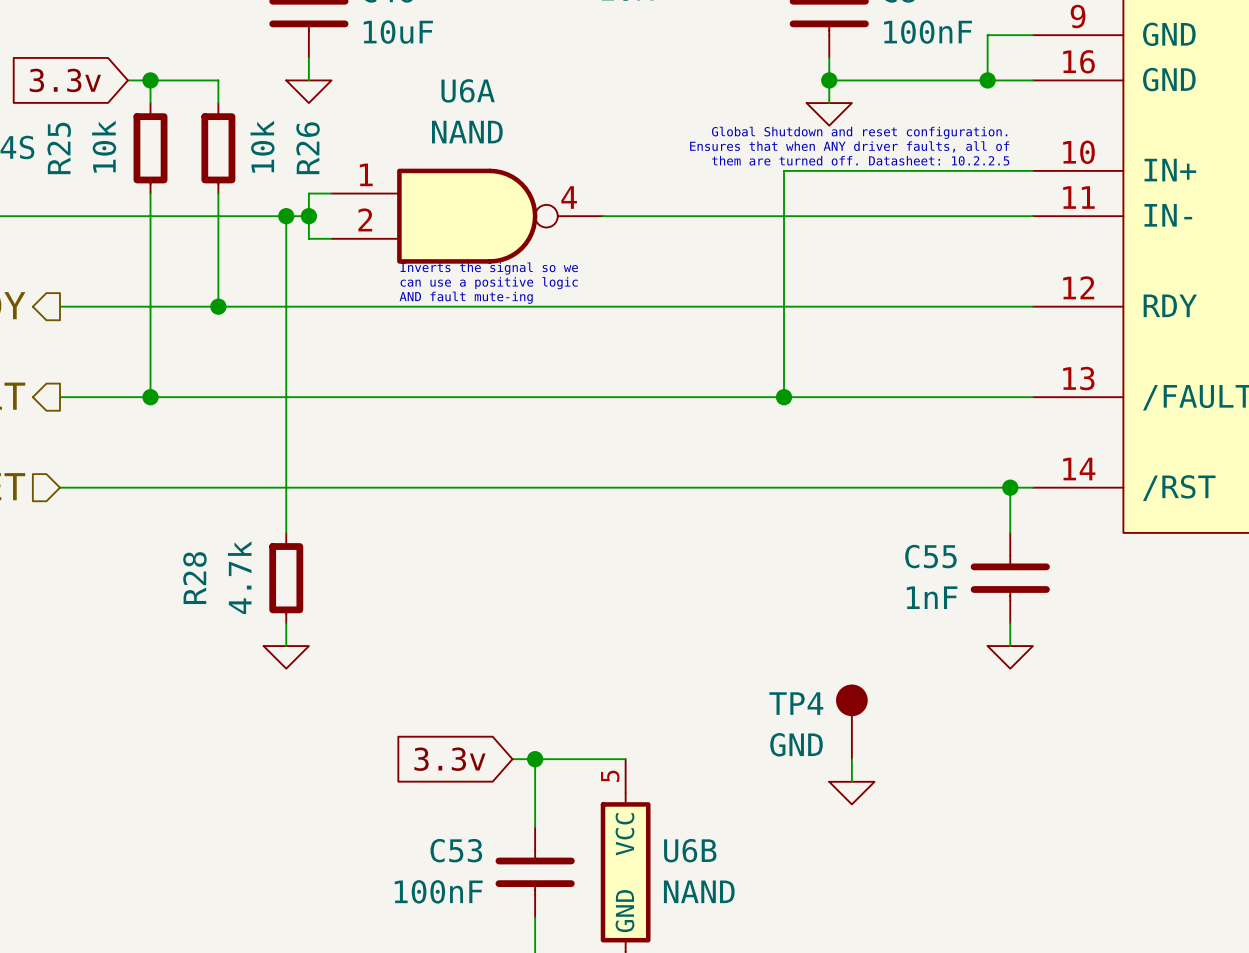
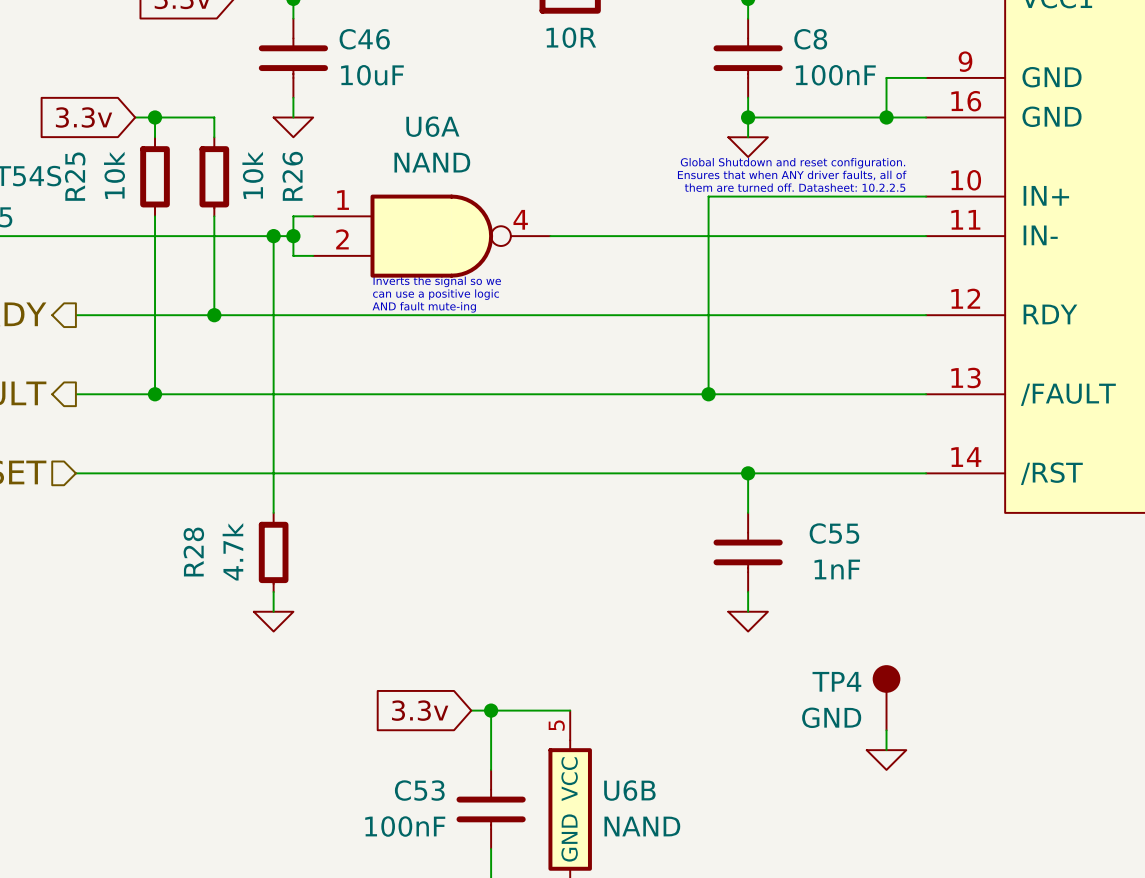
junction: none -> (748, 473)
wire: (1010, 487) (1010, 532) -> (748, 473) (748, 512)
junction: (1010, 487) -> none
C55 position: (1010, 578) -> (748, 552)
wire: (1010, 623) (1010, 646) -> (886, 730) (886, 750)
power symbol: none -> (748, 621)
power symbol: (1010, 657) -> none
TP4 position: (851, 721) -> (886, 697)
wire: (851, 759) (851, 781) -> (748, 591) (748, 611)
power symbol: (851, 793) -> none
power symbol: none -> (886, 760)

